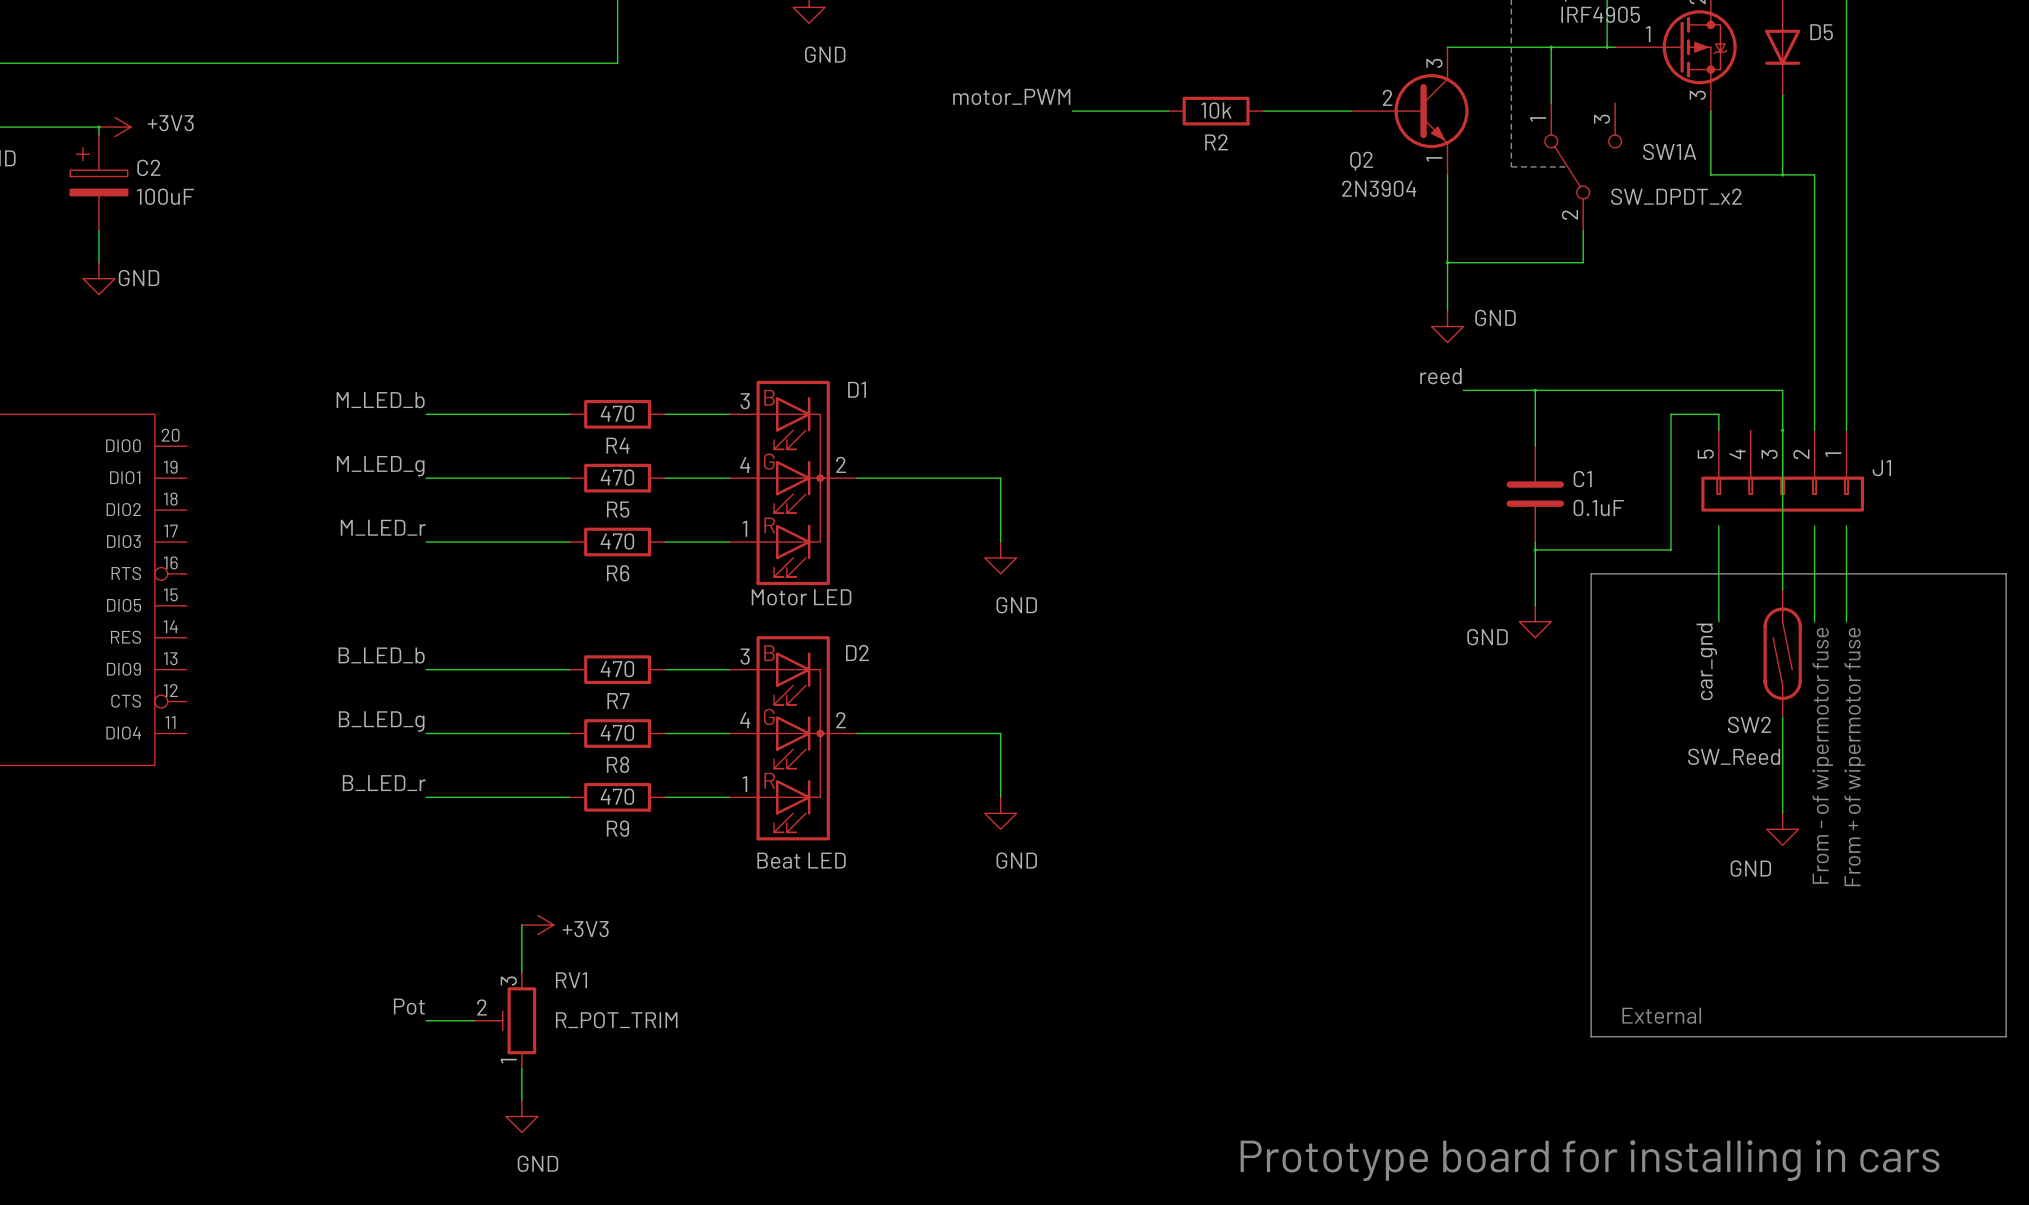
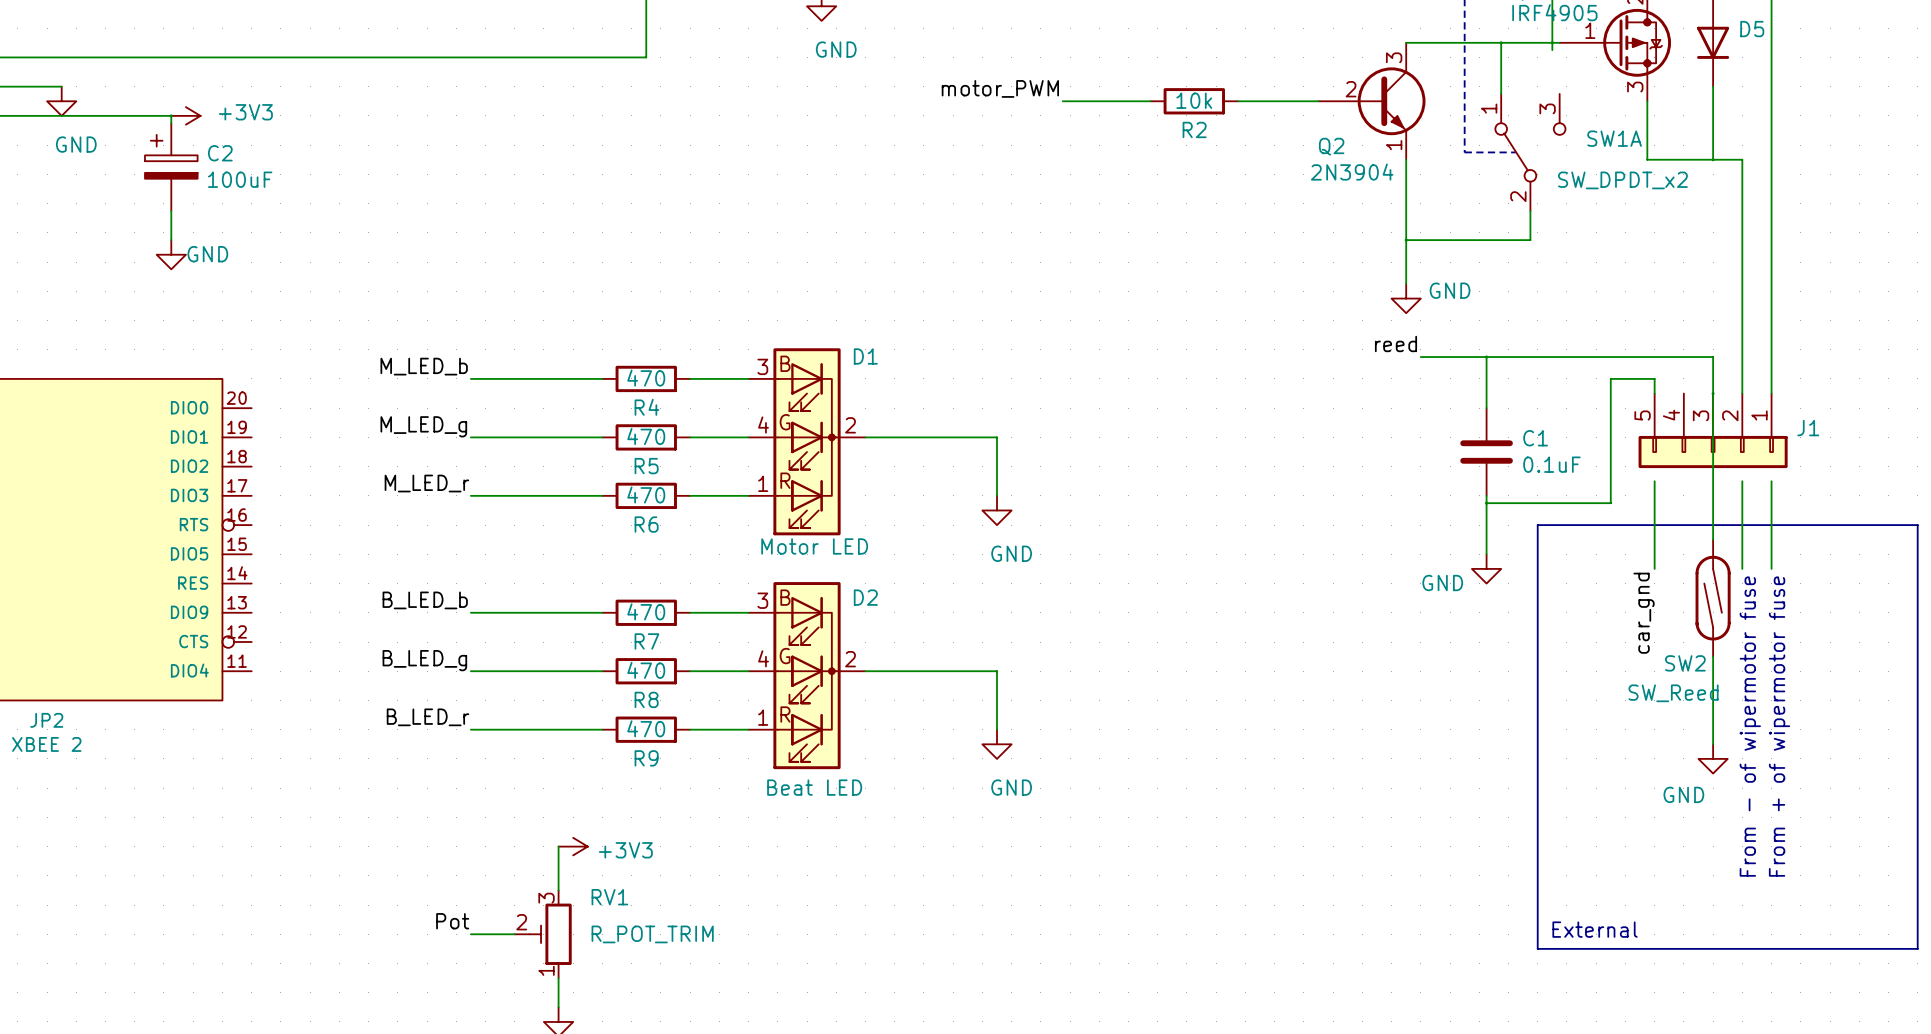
wire: none -> (1552, 42) (1552, 50)

